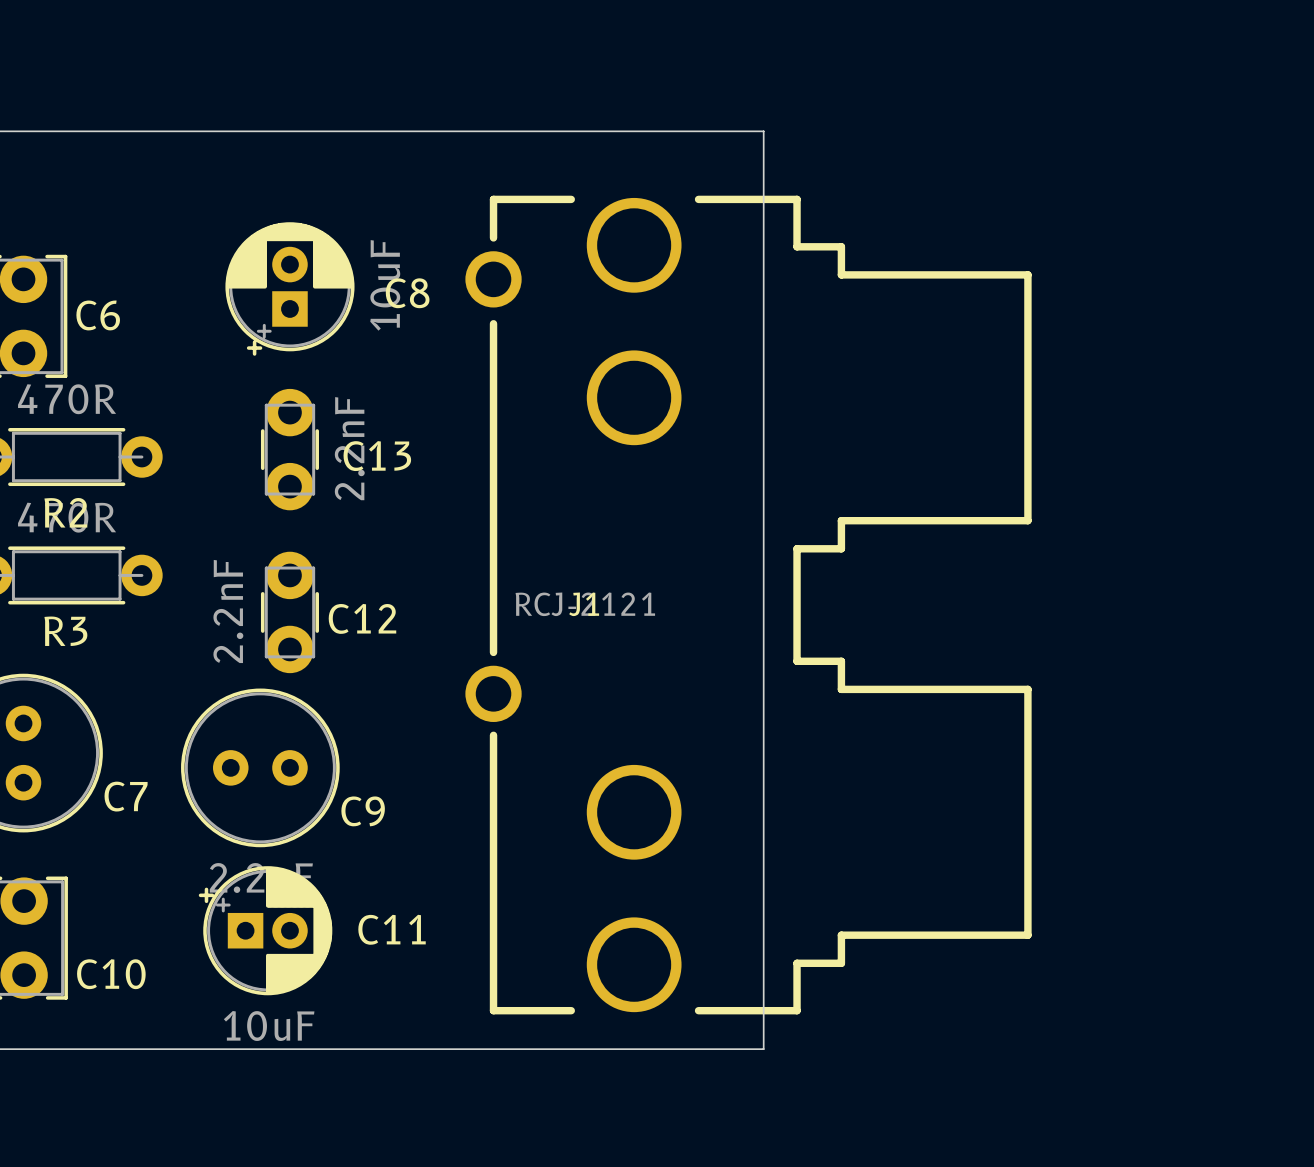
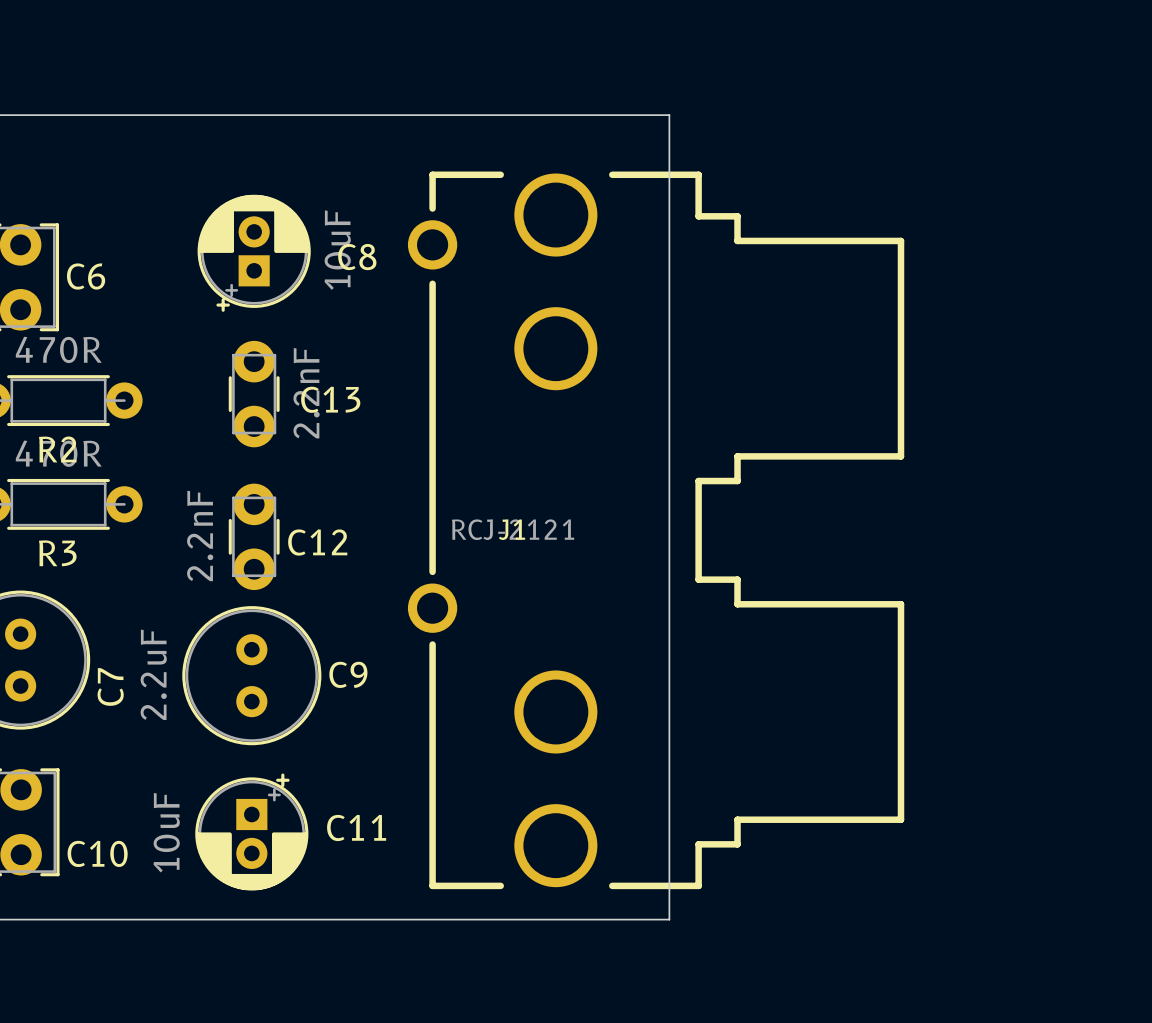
C9 rotation: 0° (260, 767) -> 90° clockwise (251, 675)
C7 name rotation: 0° (126, 796) -> 90° counterclockwise (110, 686)
C11 rotation: 0° (265, 930) -> 90° clockwise (251, 832)

